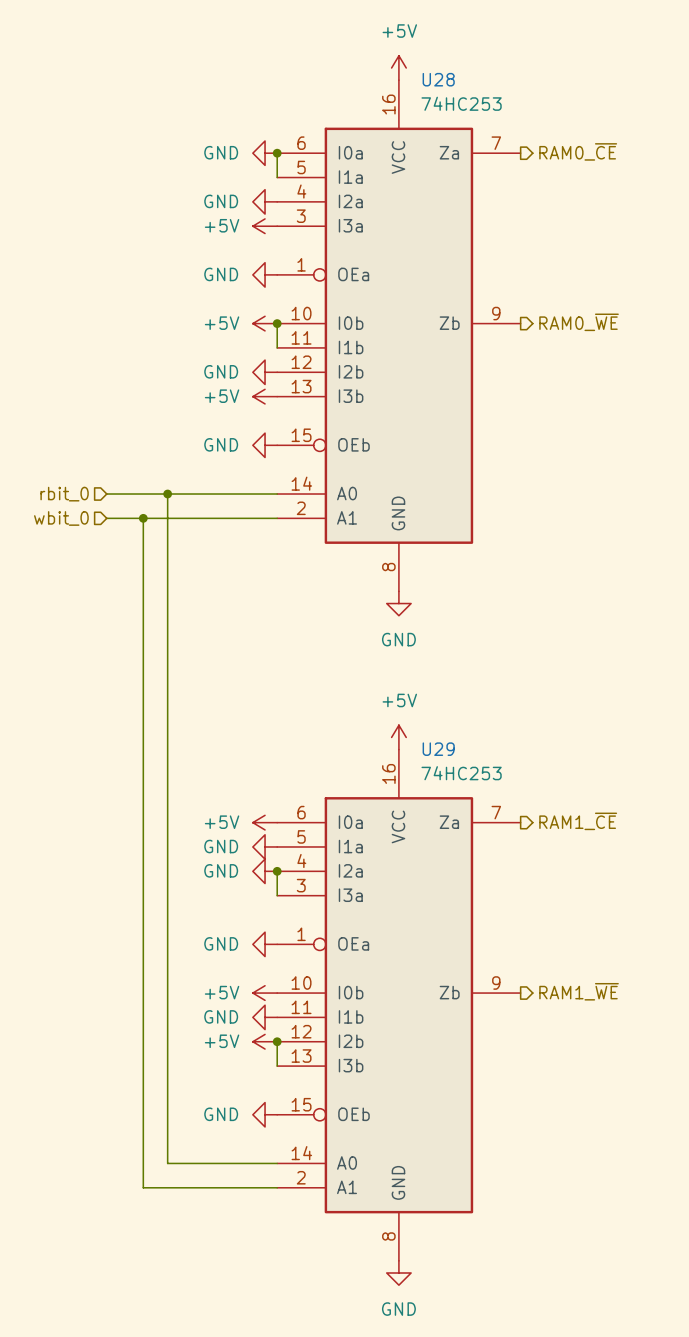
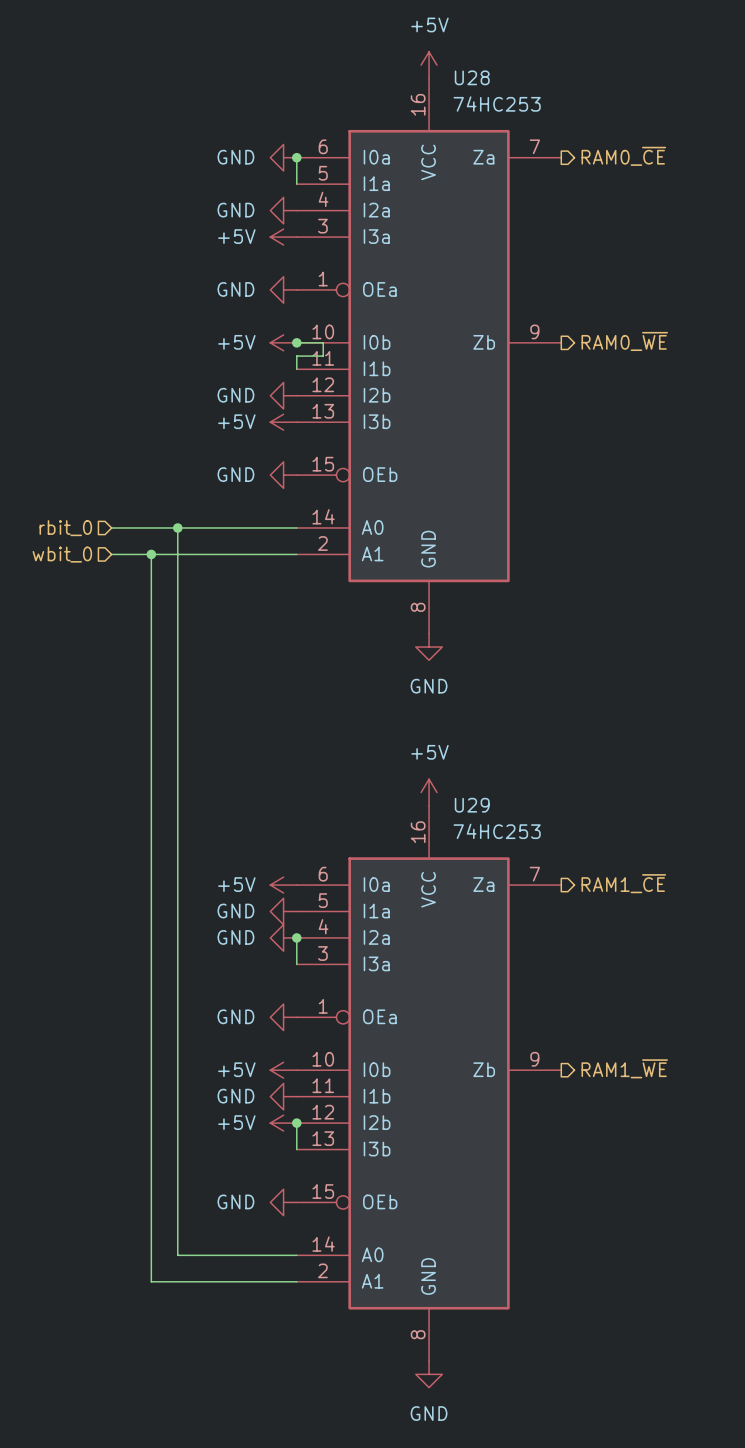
wire: (277, 323) (277, 335) -> (296, 342) (323, 342) (323, 356) (296, 356)

